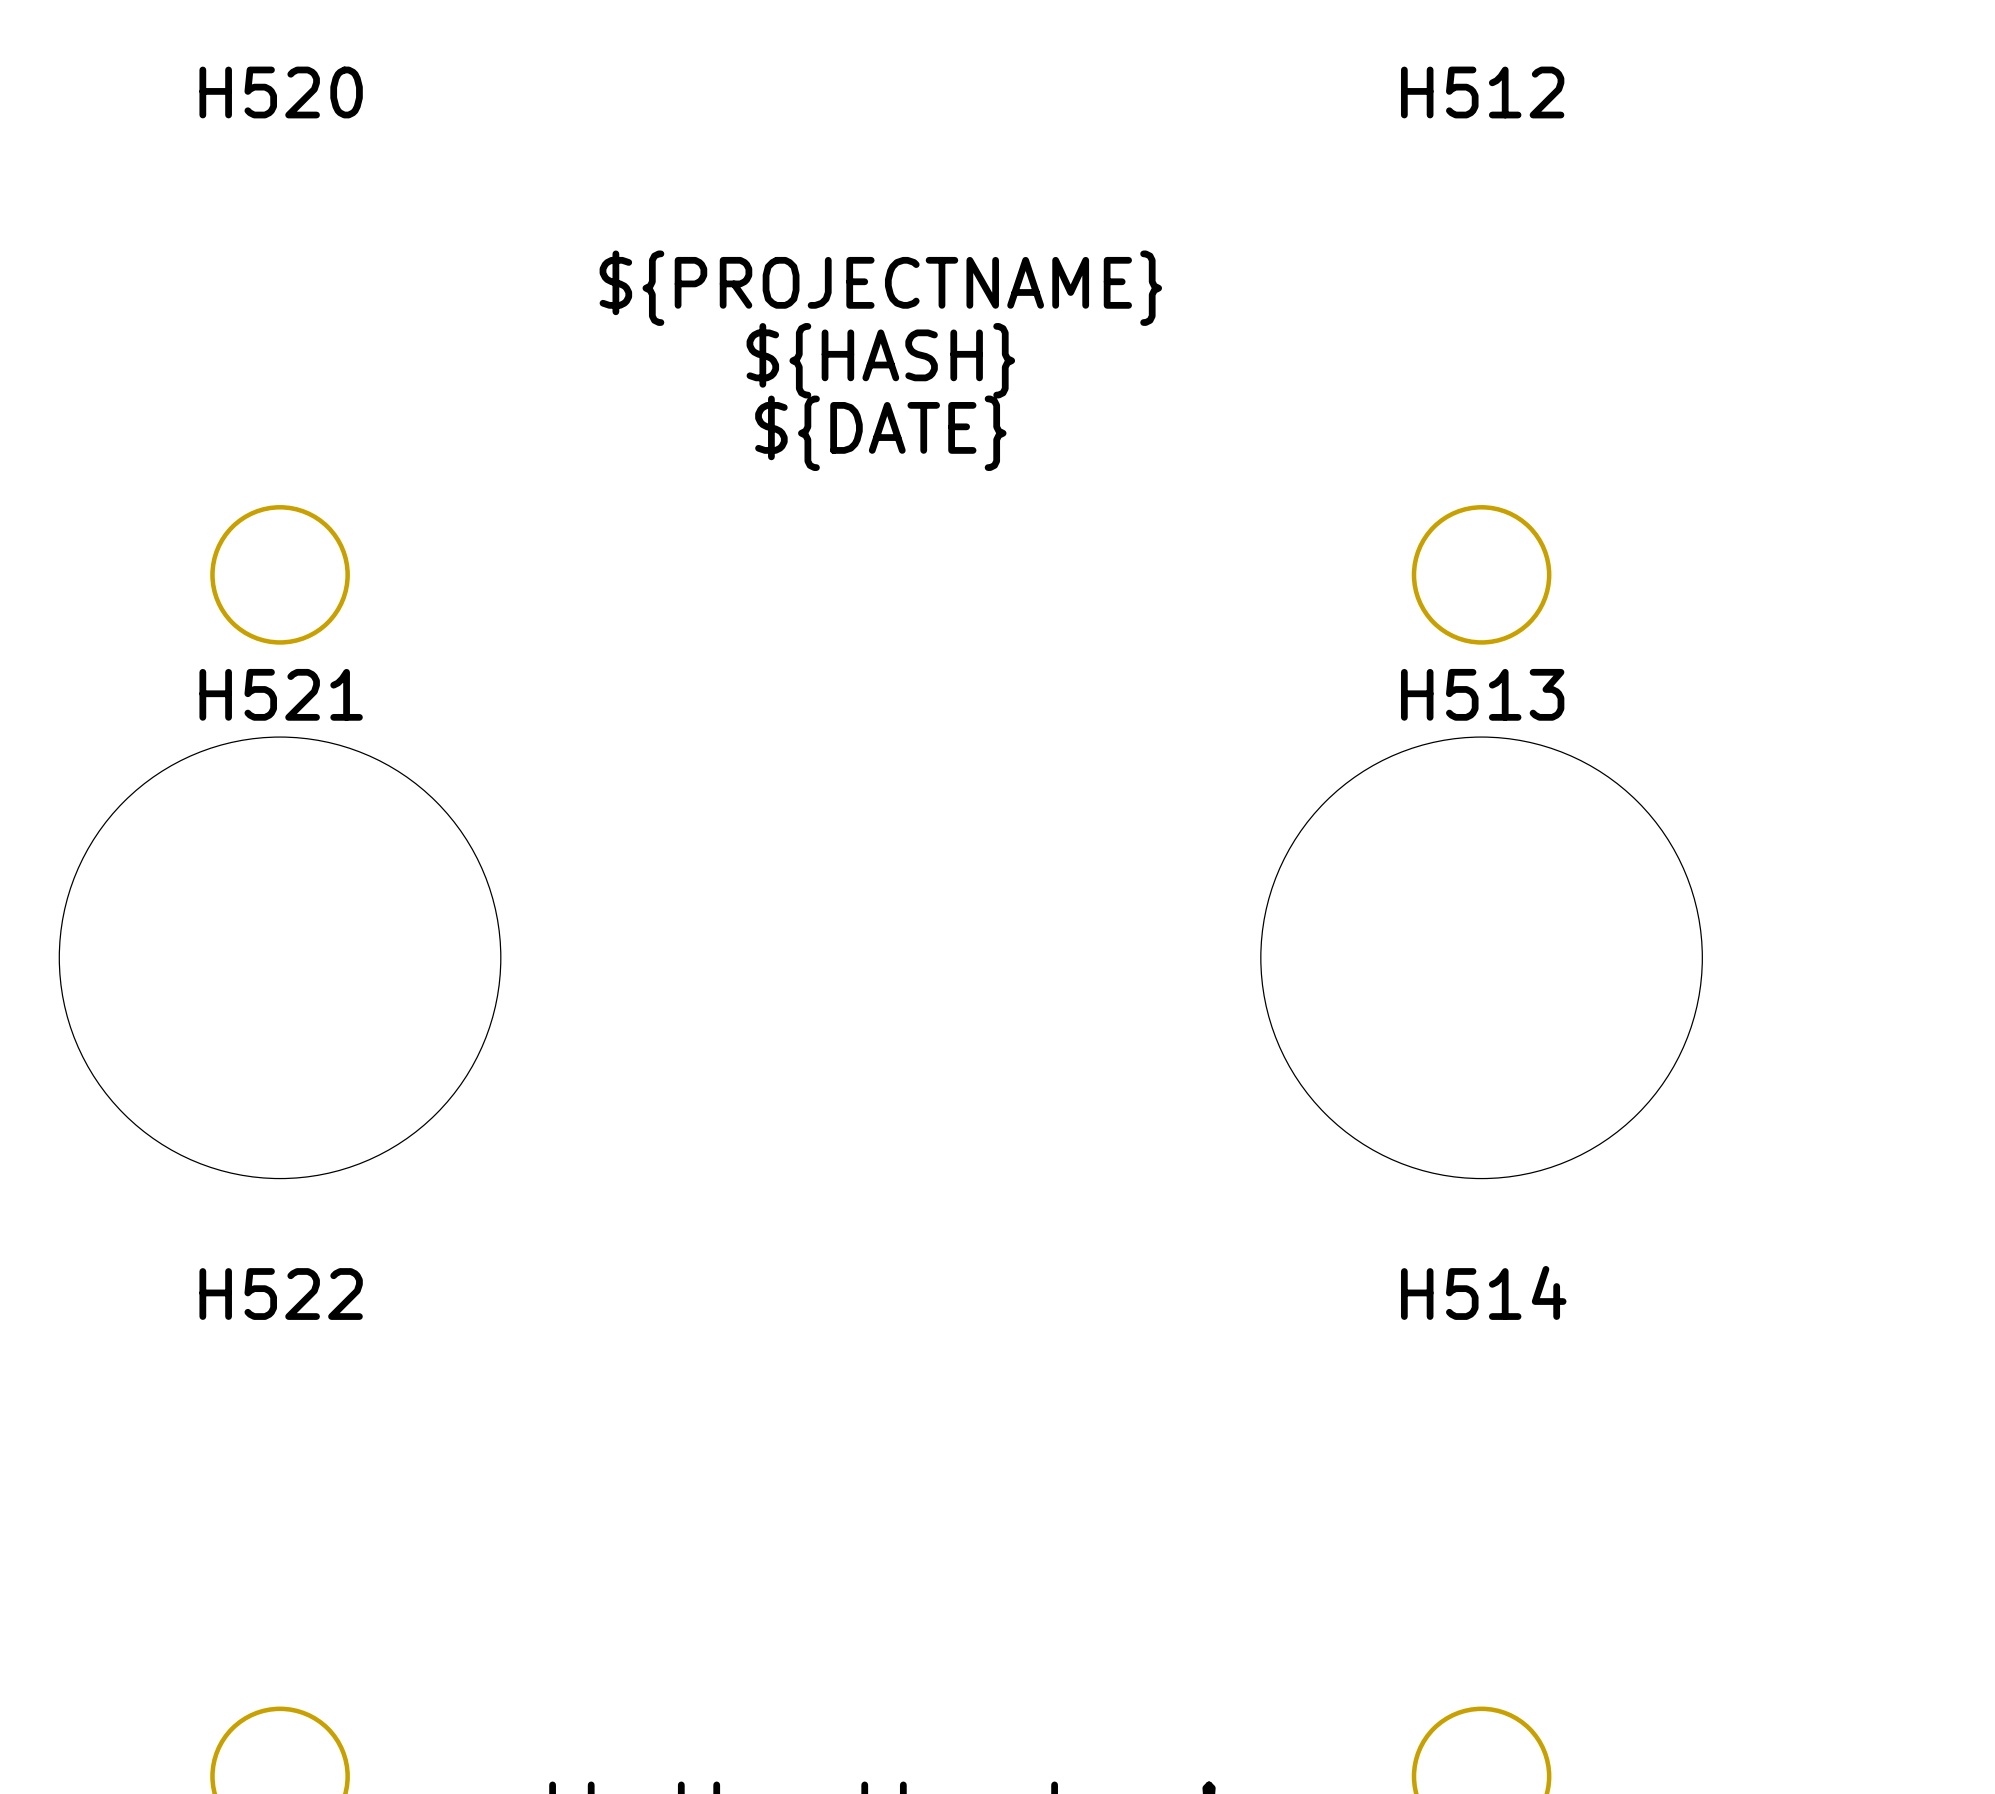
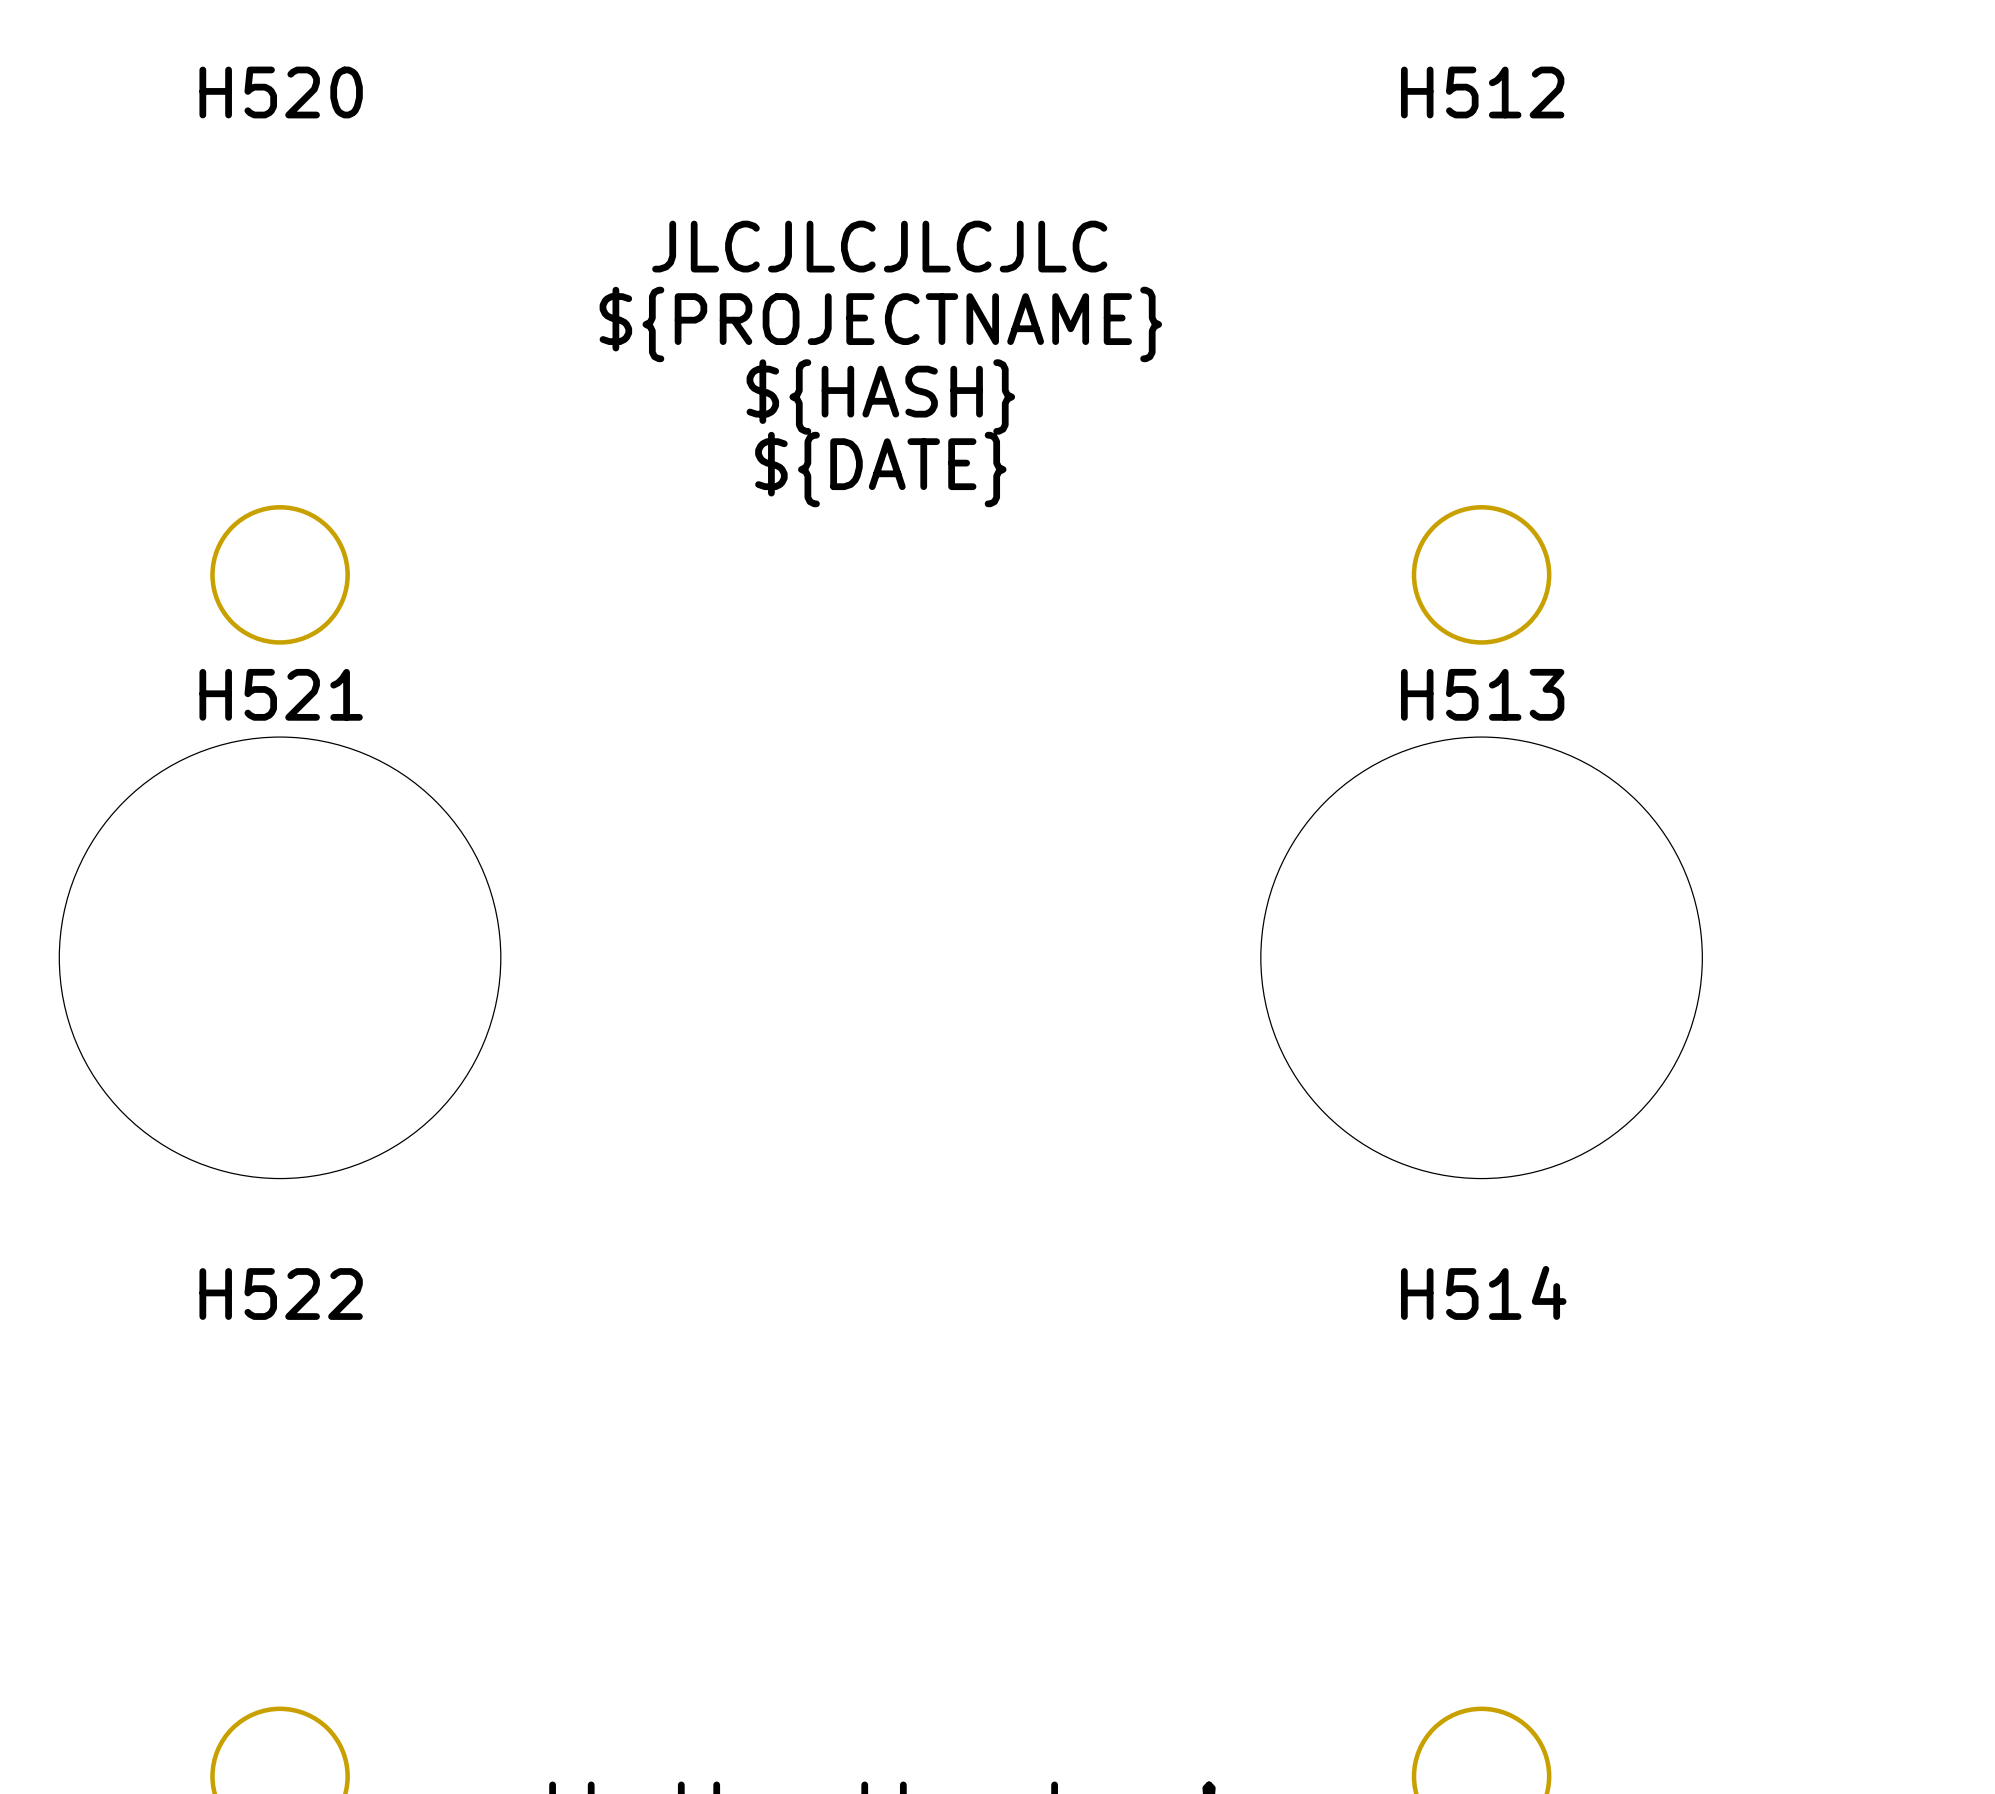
text: none -> JLCJLCJLCJLC (879, 246)
text position: ${PROJECTNAME} (880, 288) -> ${PROJECTNAME} (880, 324)
text position: ${HASH} (880, 360) -> ${HASH} (880, 396)
text position: ${DATE} (880, 433) -> ${DATE} (880, 469)

